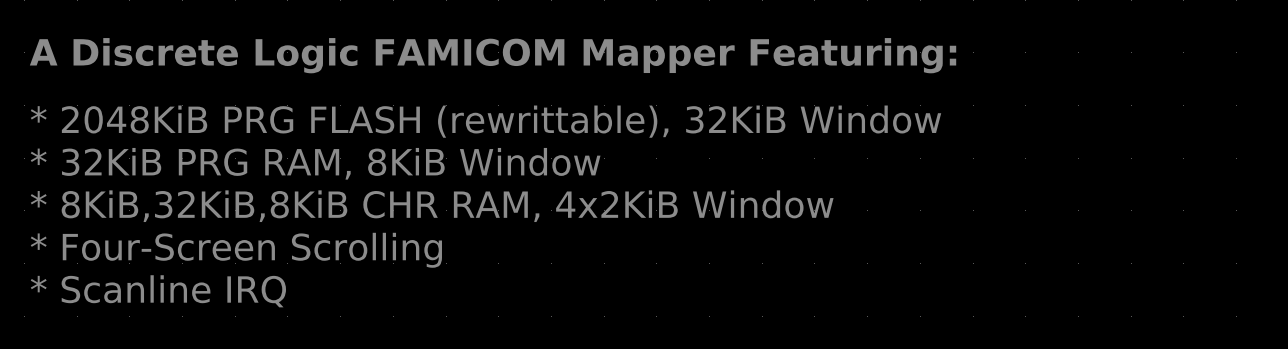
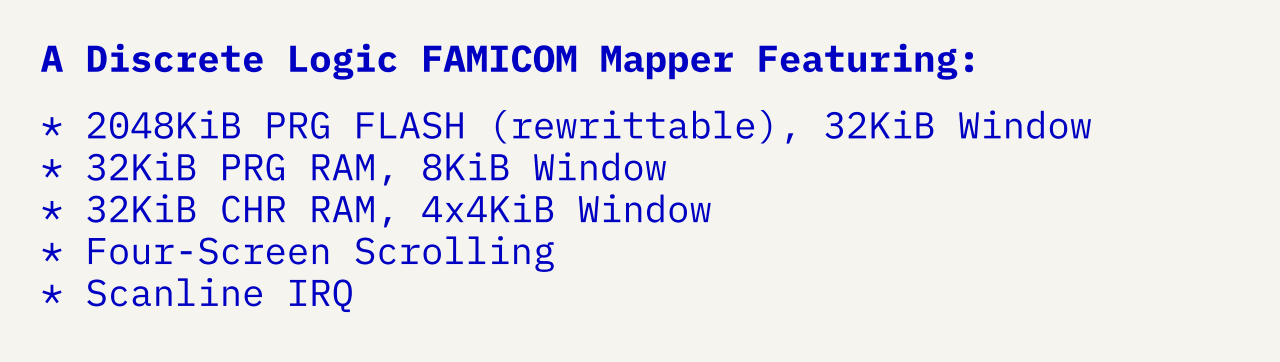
text: * 8KiB,32KiB,8KiB CHR RAM, 4x2KiB Window (432, 206) -> * 32KiB CHR RAM, 4x4KiB Window (376, 210)

